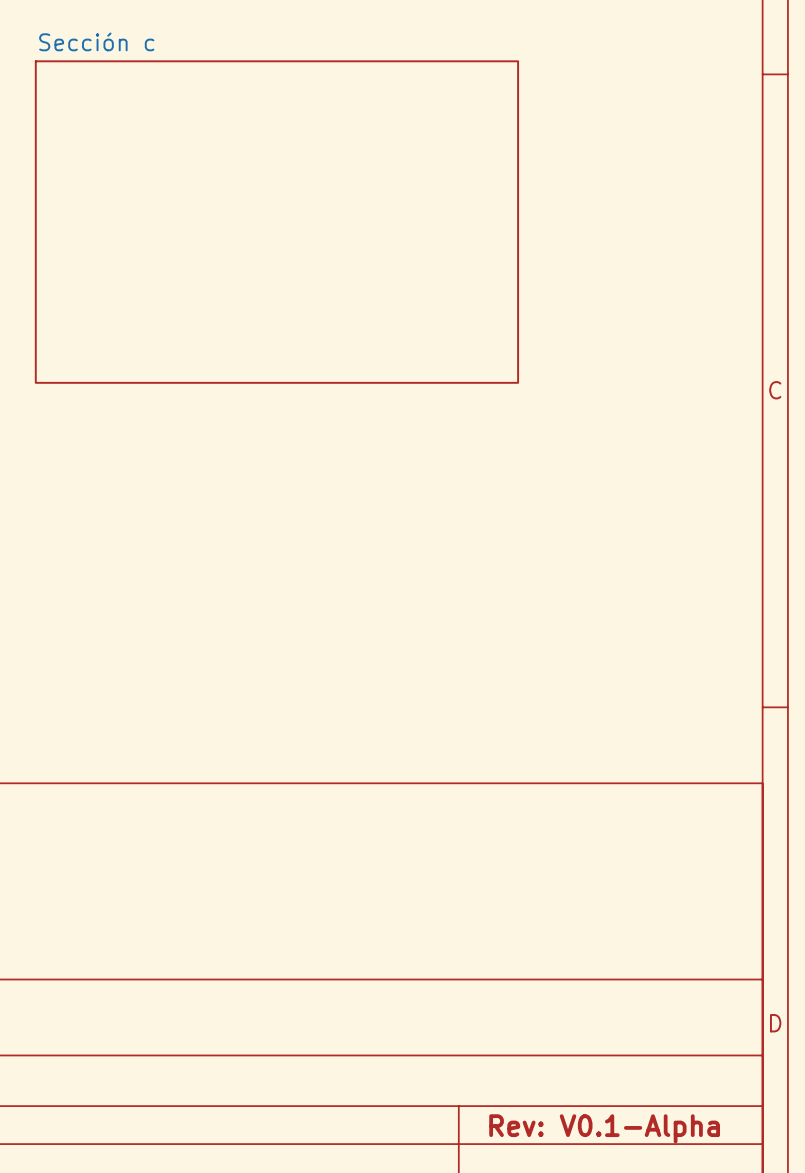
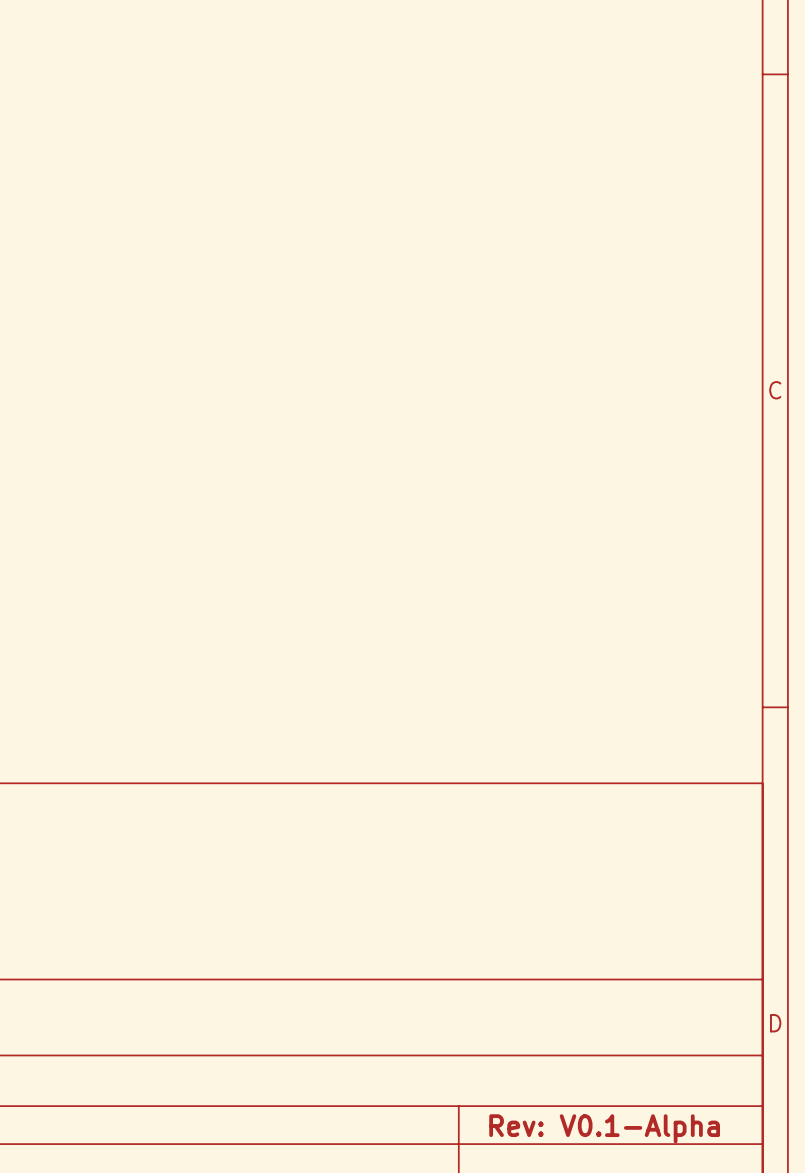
sheet Sección c: (276, 222) -> none

